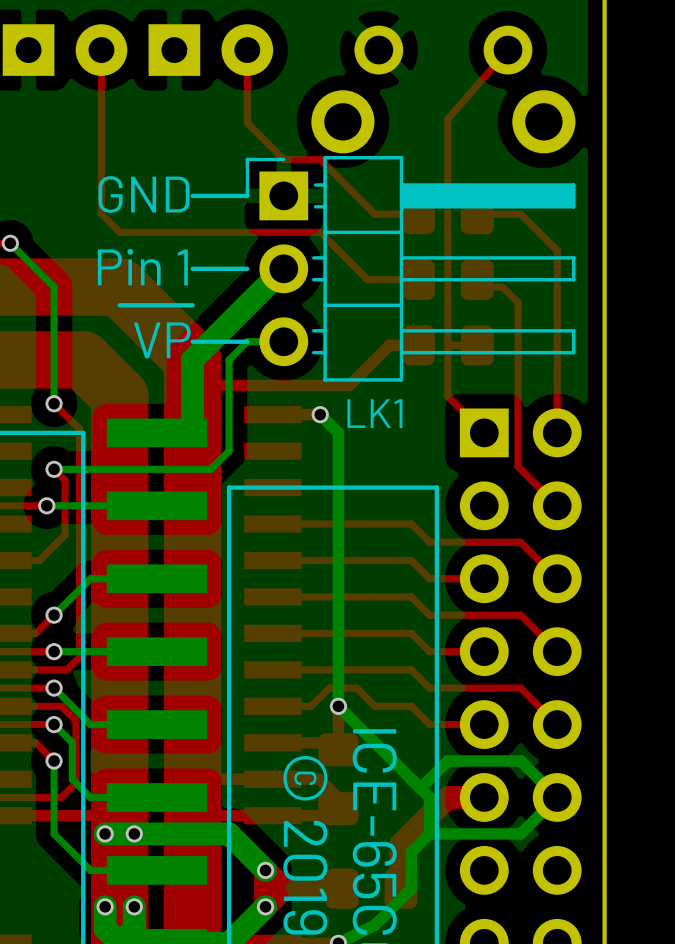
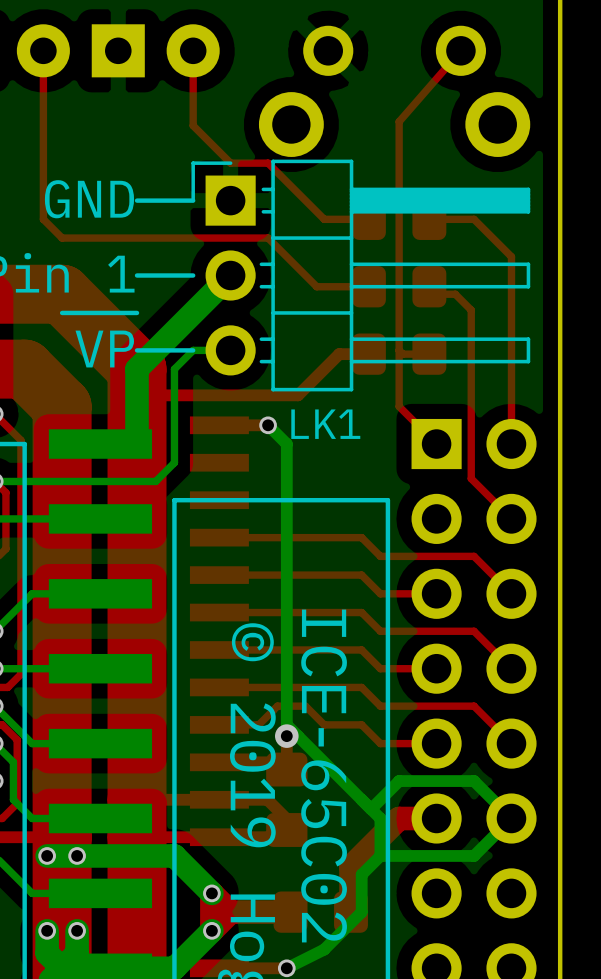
via size: [329, 697, 348, 715] -> [275, 724, 299, 748]

